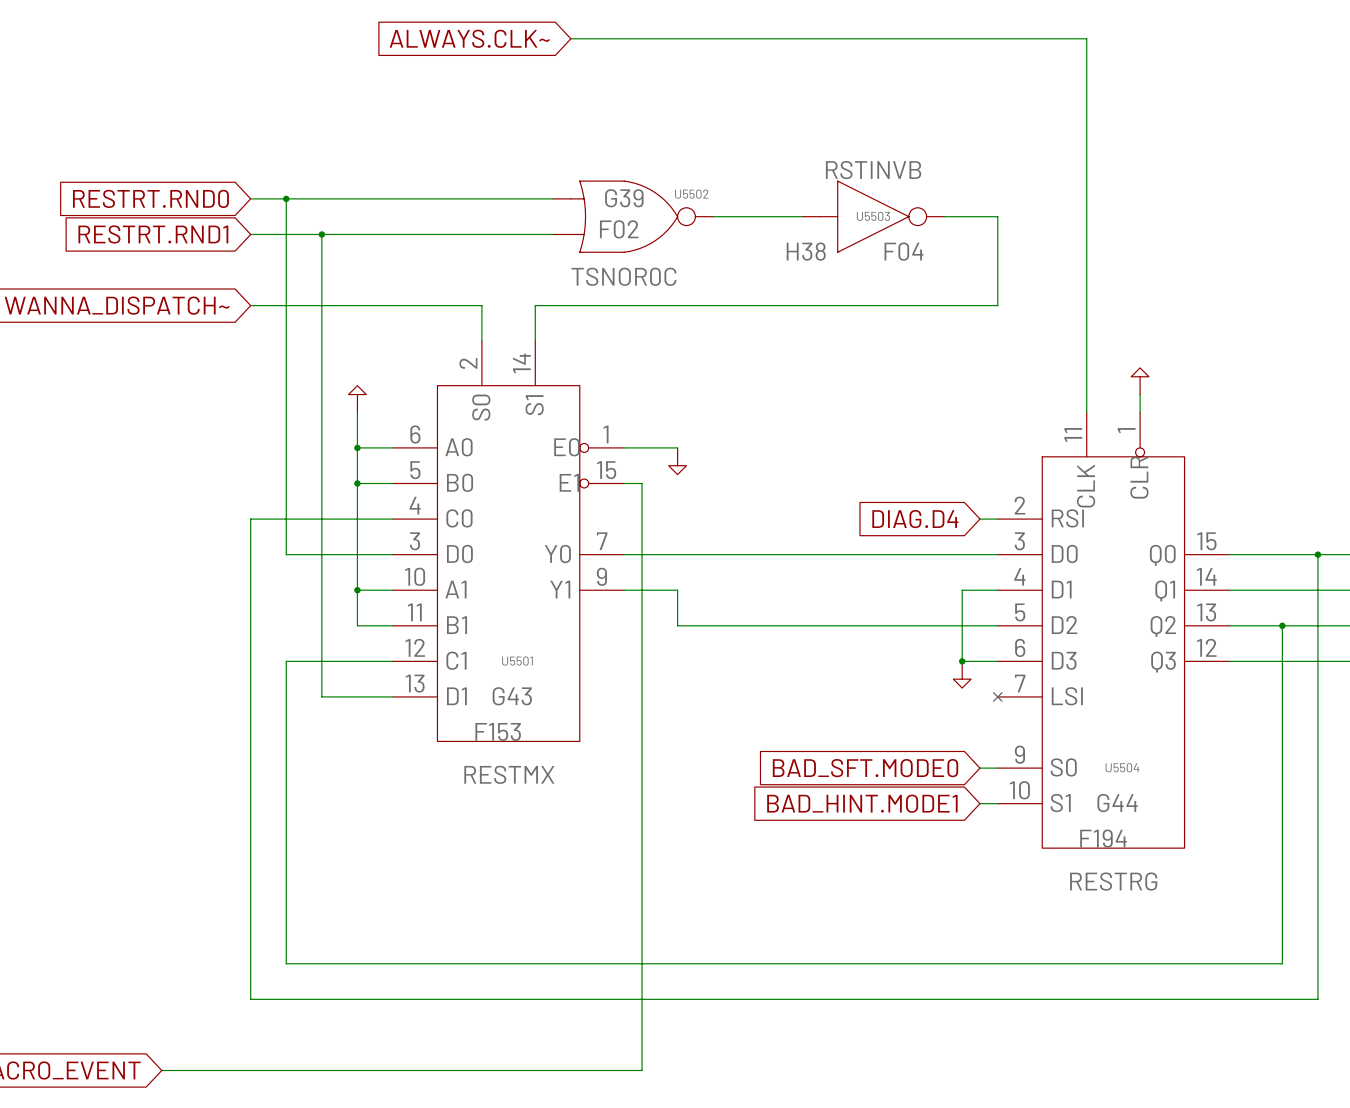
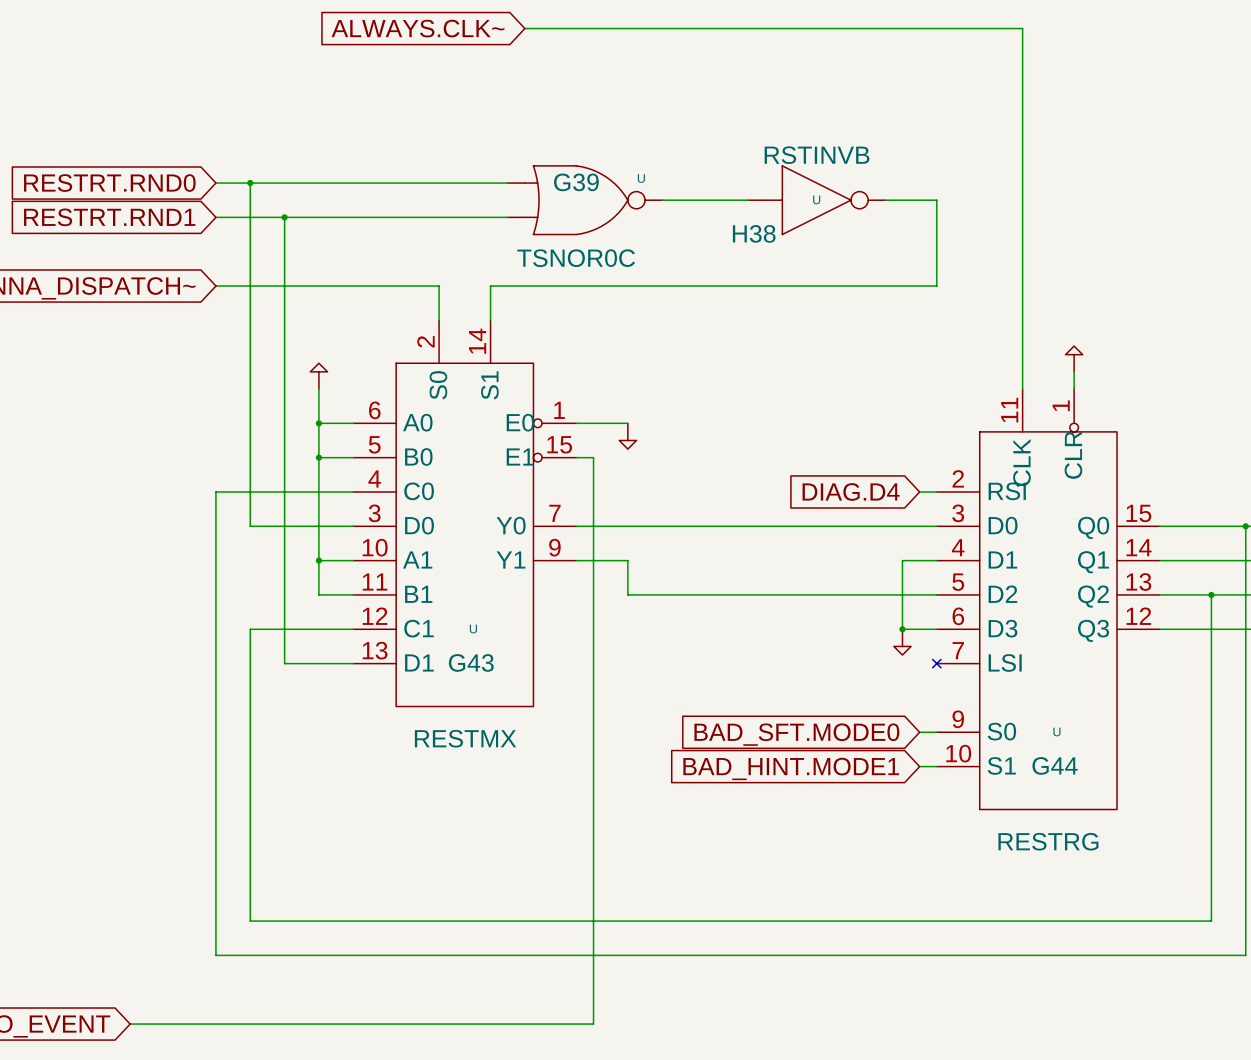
U5502 name: U5502 (691, 194) -> U (641, 178)
U5503 name: U5503 (873, 216) -> U (816, 199)
U5502 value: F02 (619, 229) -> none
U5503 value: F04 (903, 251) -> none
U5501 name: U5501 (517, 661) -> U (473, 629)
U5501 value: F153 (498, 731) -> none
U5504 name: U5504 (1122, 767) -> U (1056, 732)
U5504 value: F194 (1103, 838) -> none

